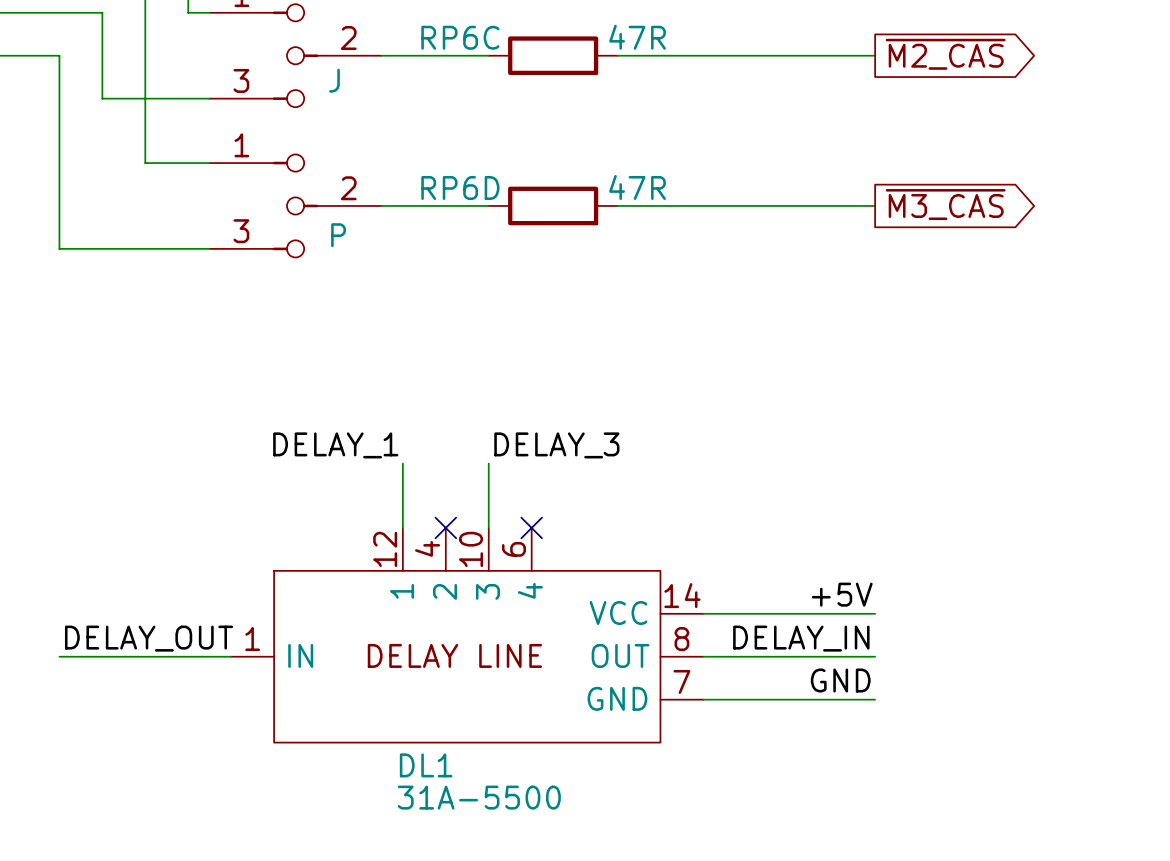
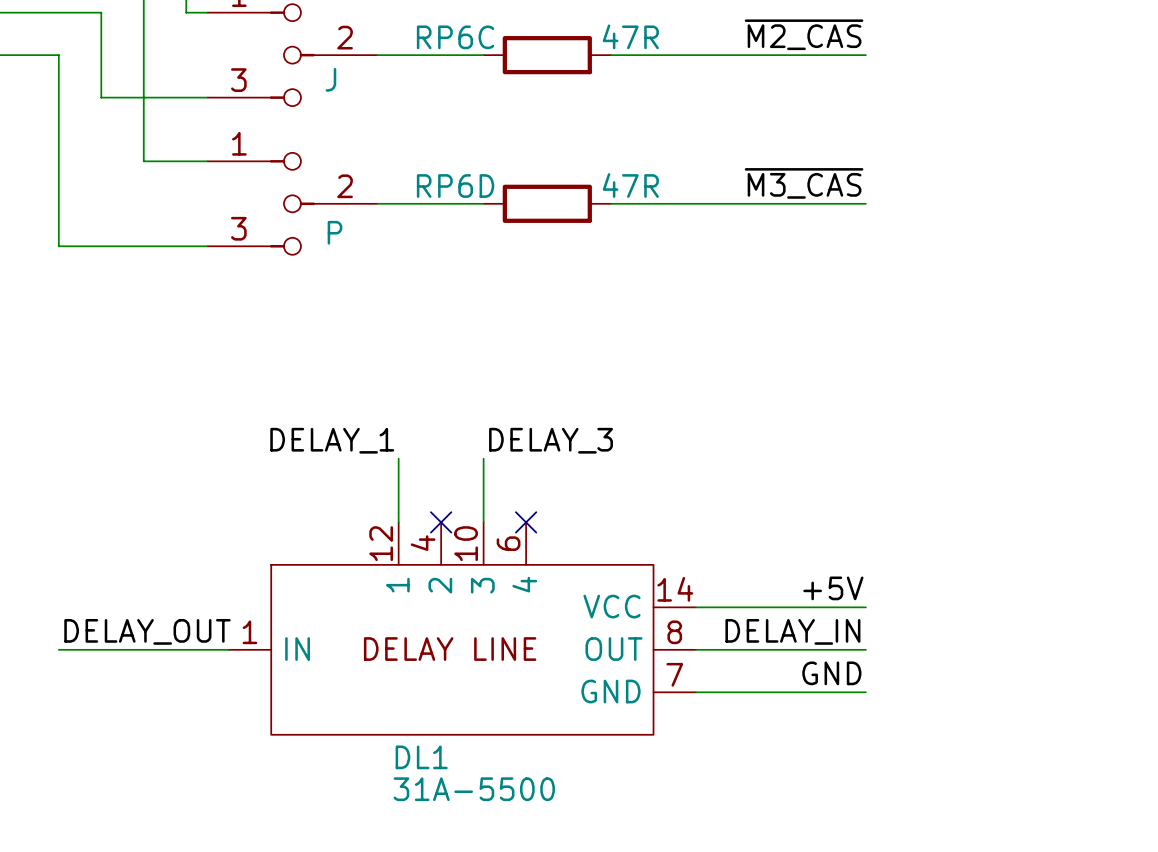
label: none -> ~{M2_CAS} (804, 34)
global label: ~{M2_CAS} (945, 54) -> none
label: none -> ~{M3_CAS} (804, 183)
global label: ~{M3_CAS} (945, 204) -> none

